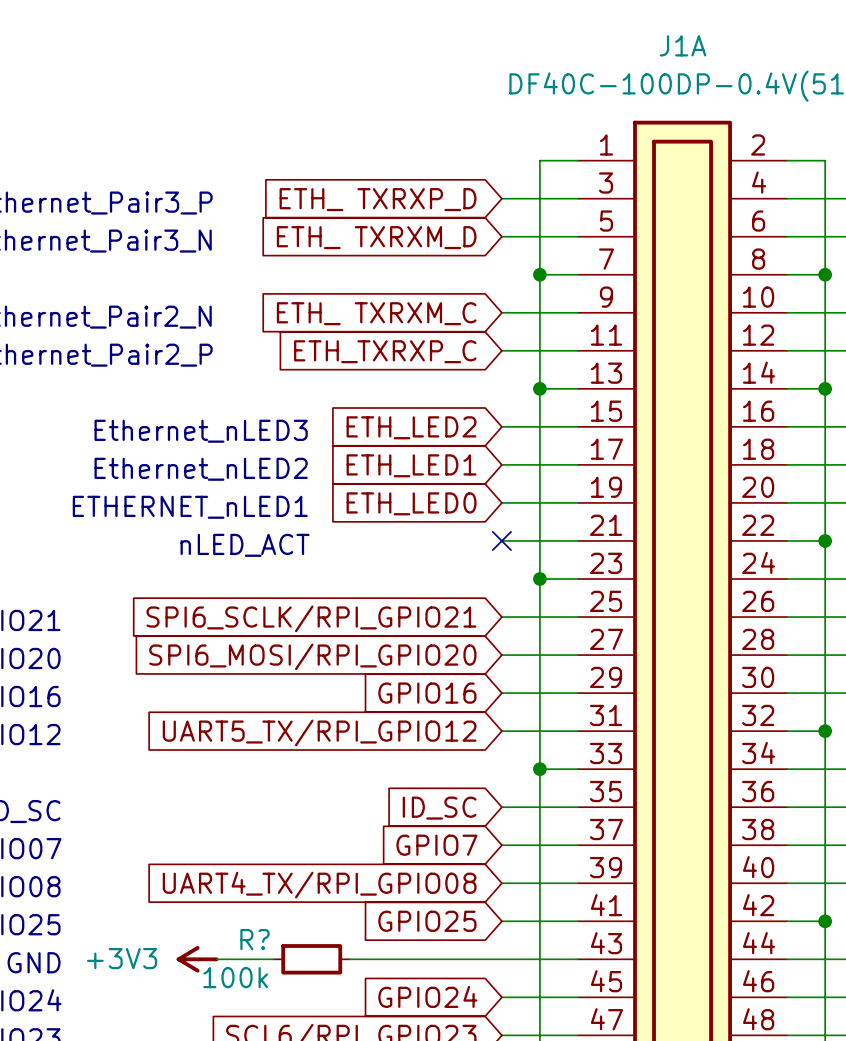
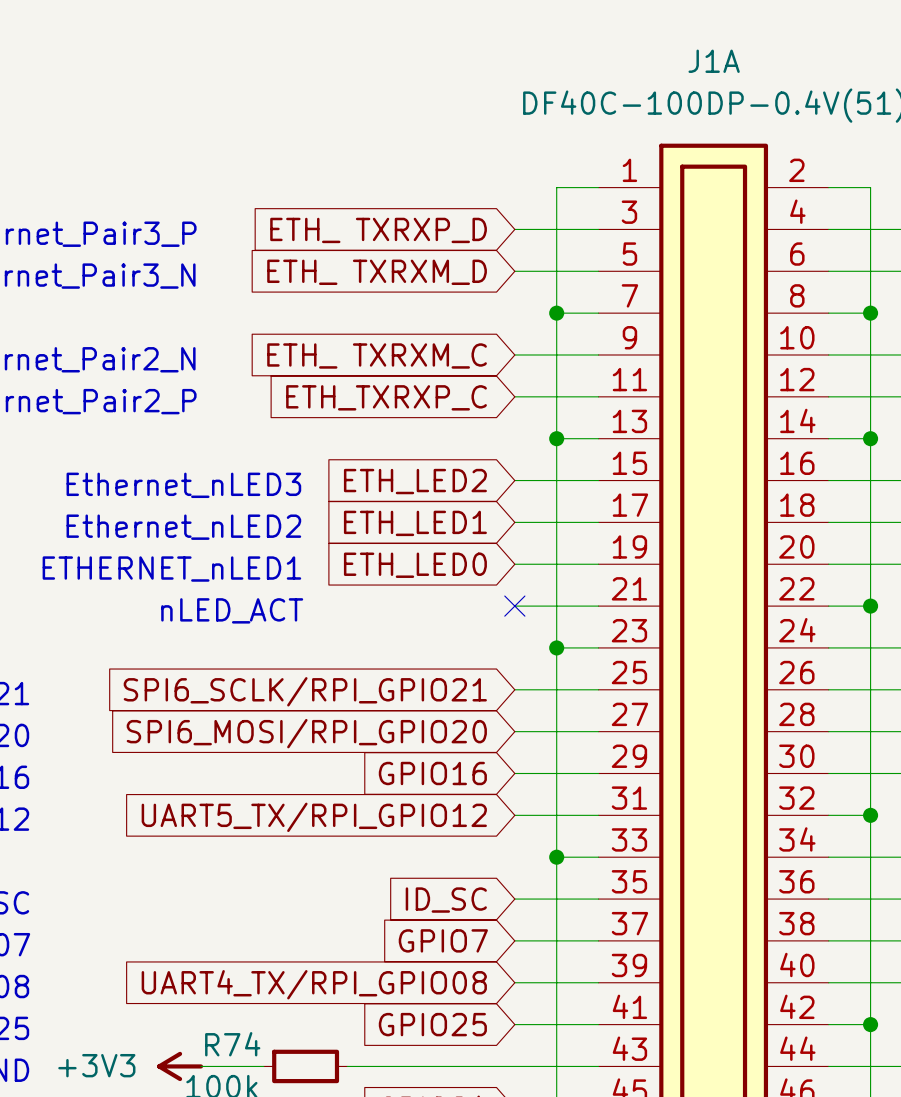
R? name: R? (255, 939) -> R74 (232, 1044)

